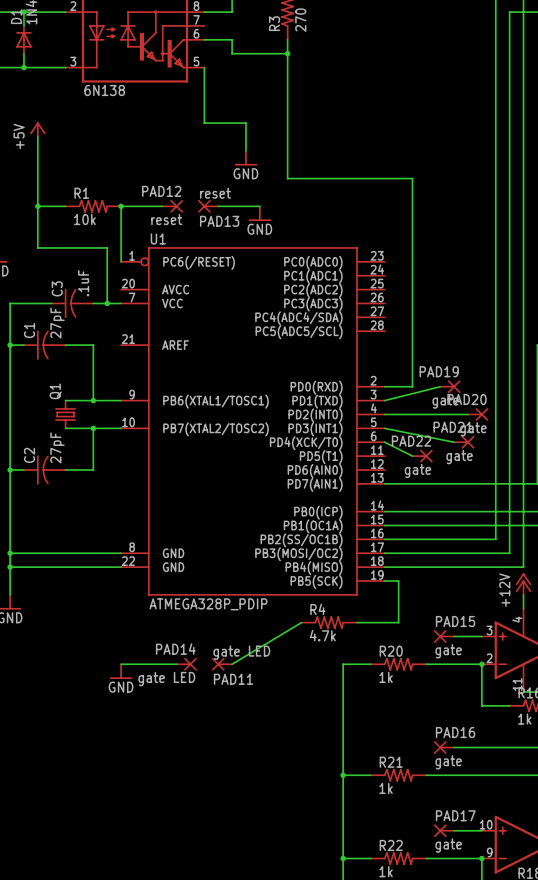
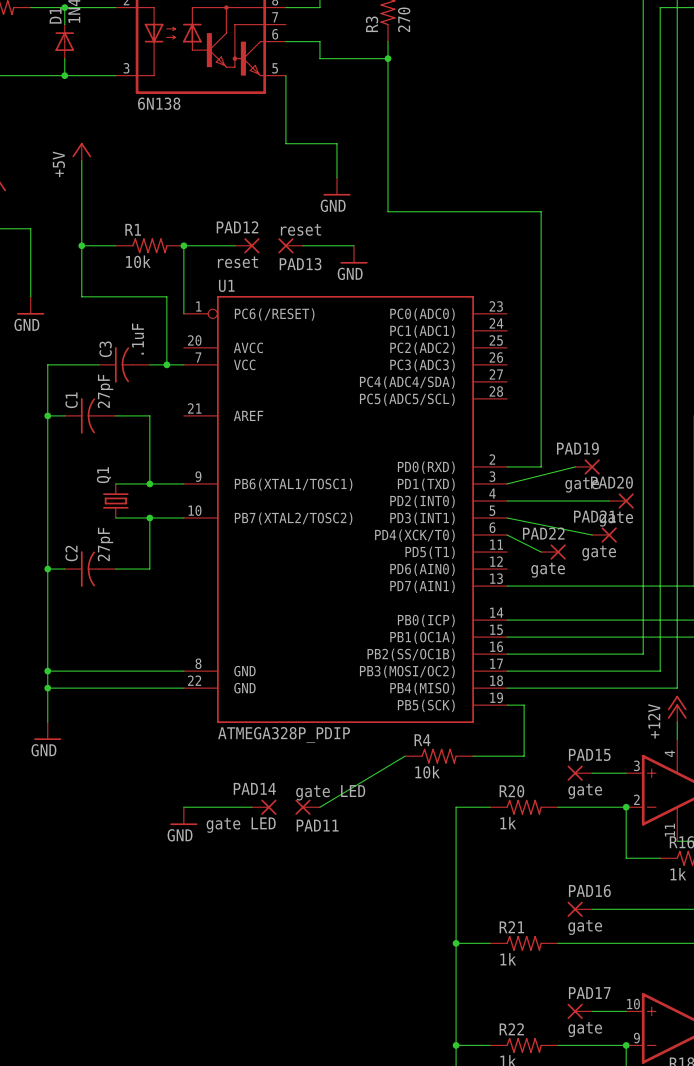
R4 value: 4.7k (322, 635) -> 10k (427, 772)

